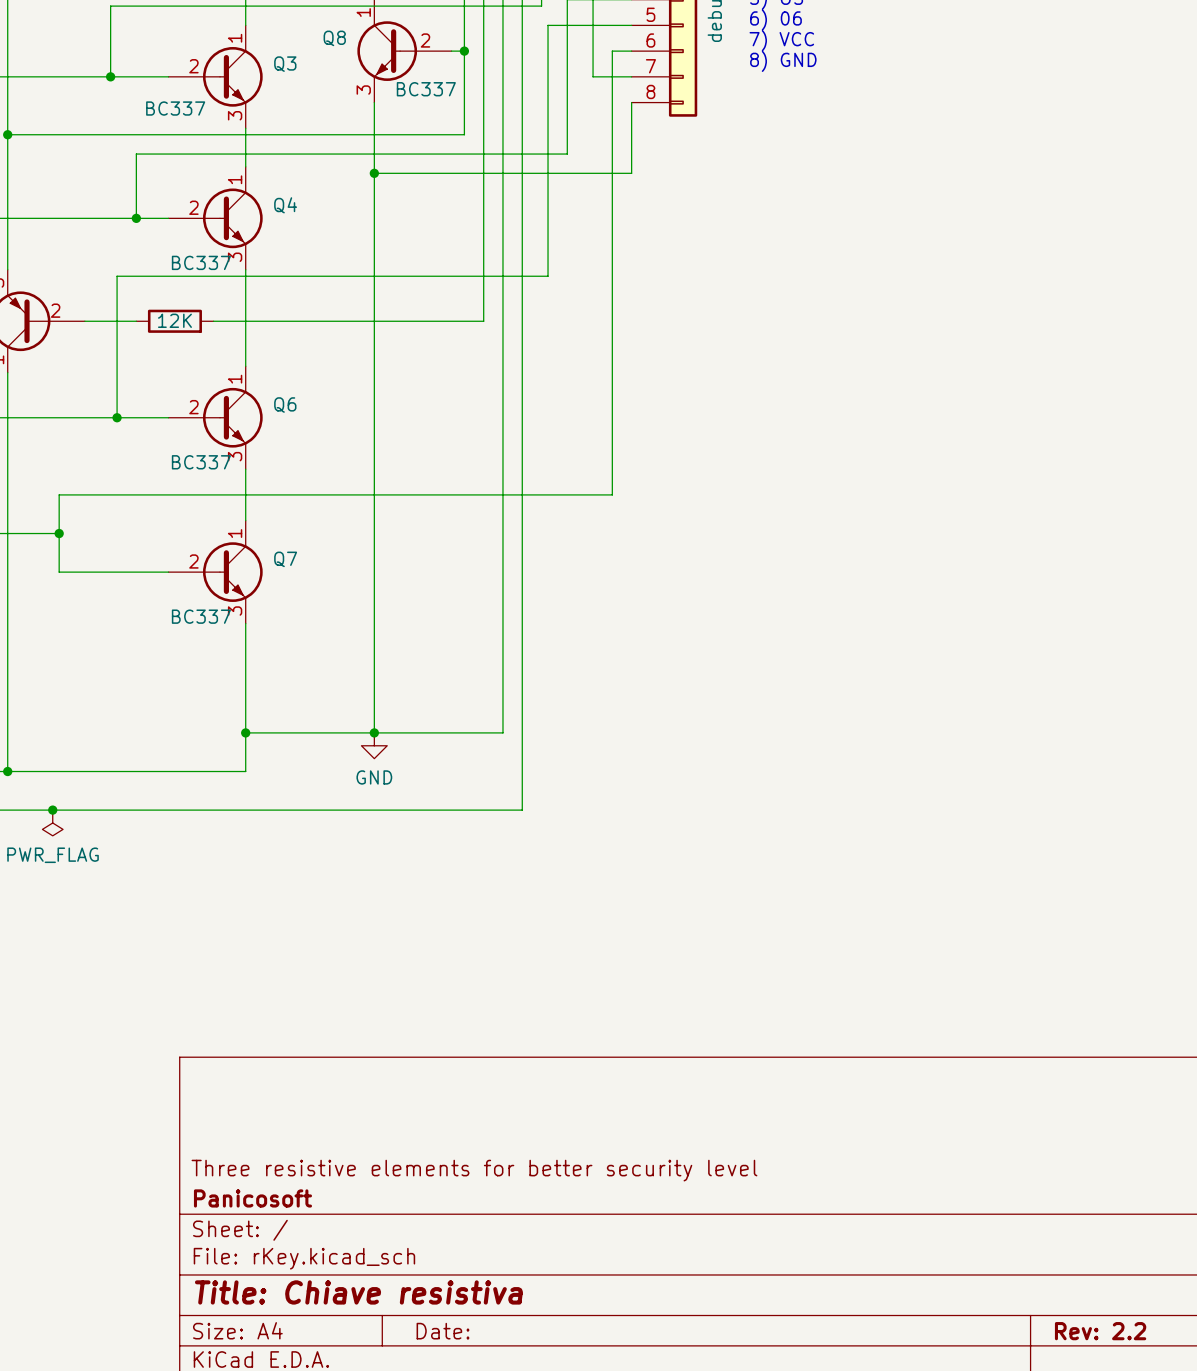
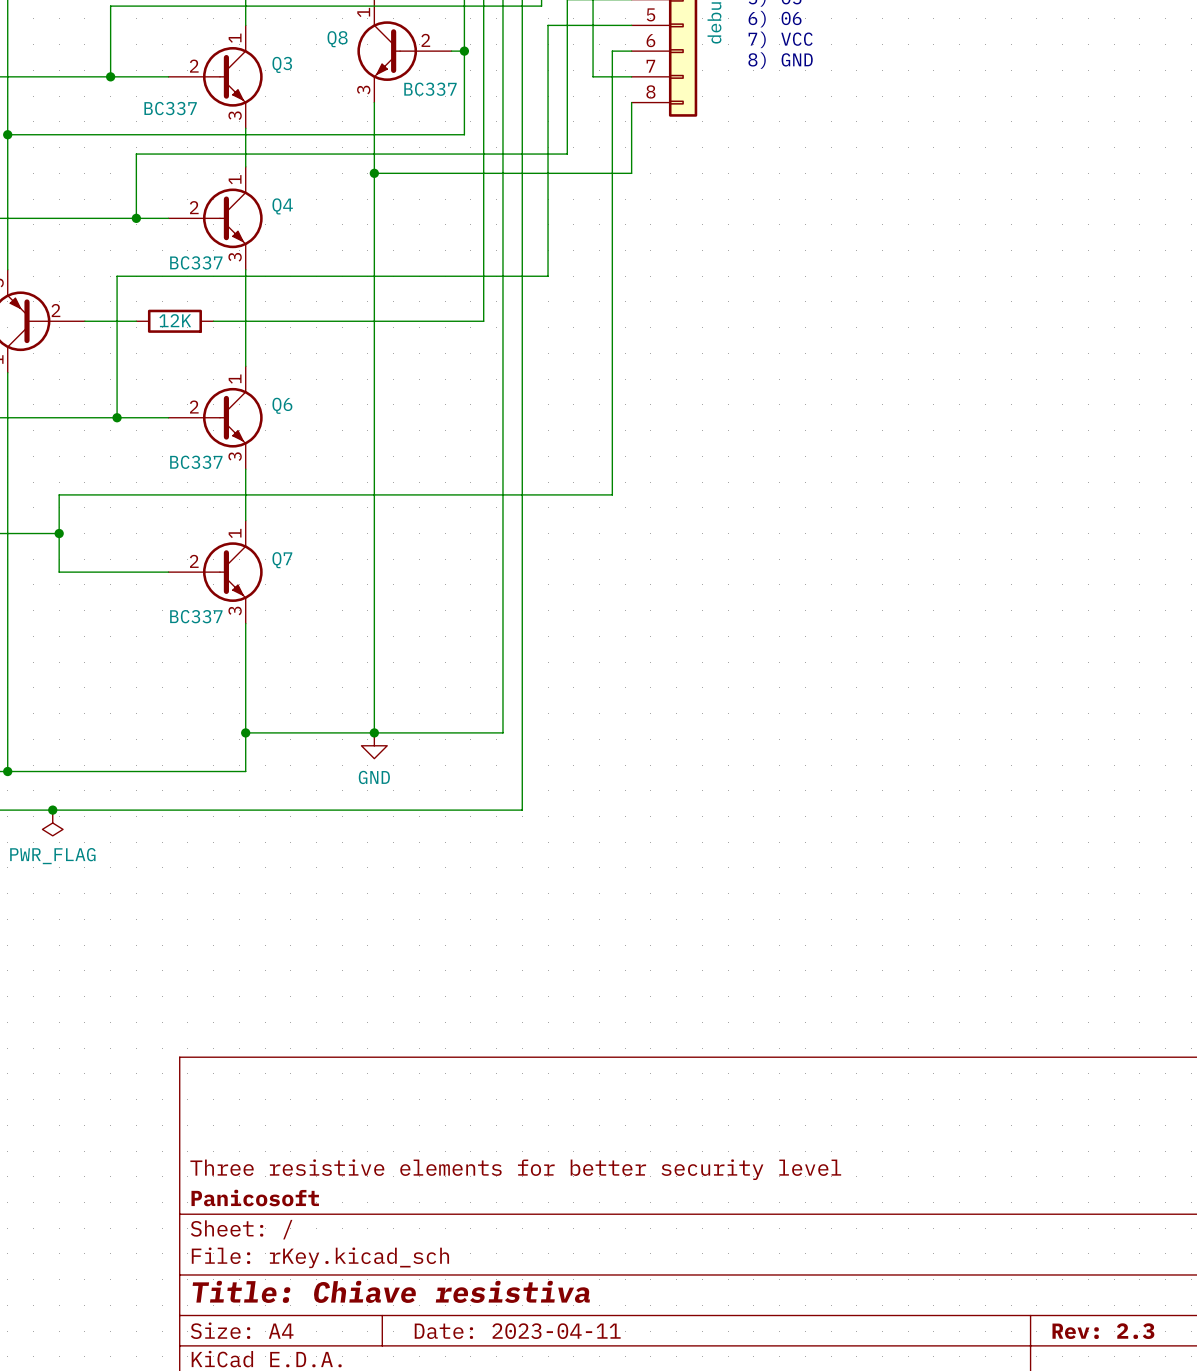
title block: Date: (443, 1331) -> Date: 2023-04-11 (517, 1331)
title block: Rev: 2.2 (1100, 1331) -> Rev: 2.3 (1103, 1331)

